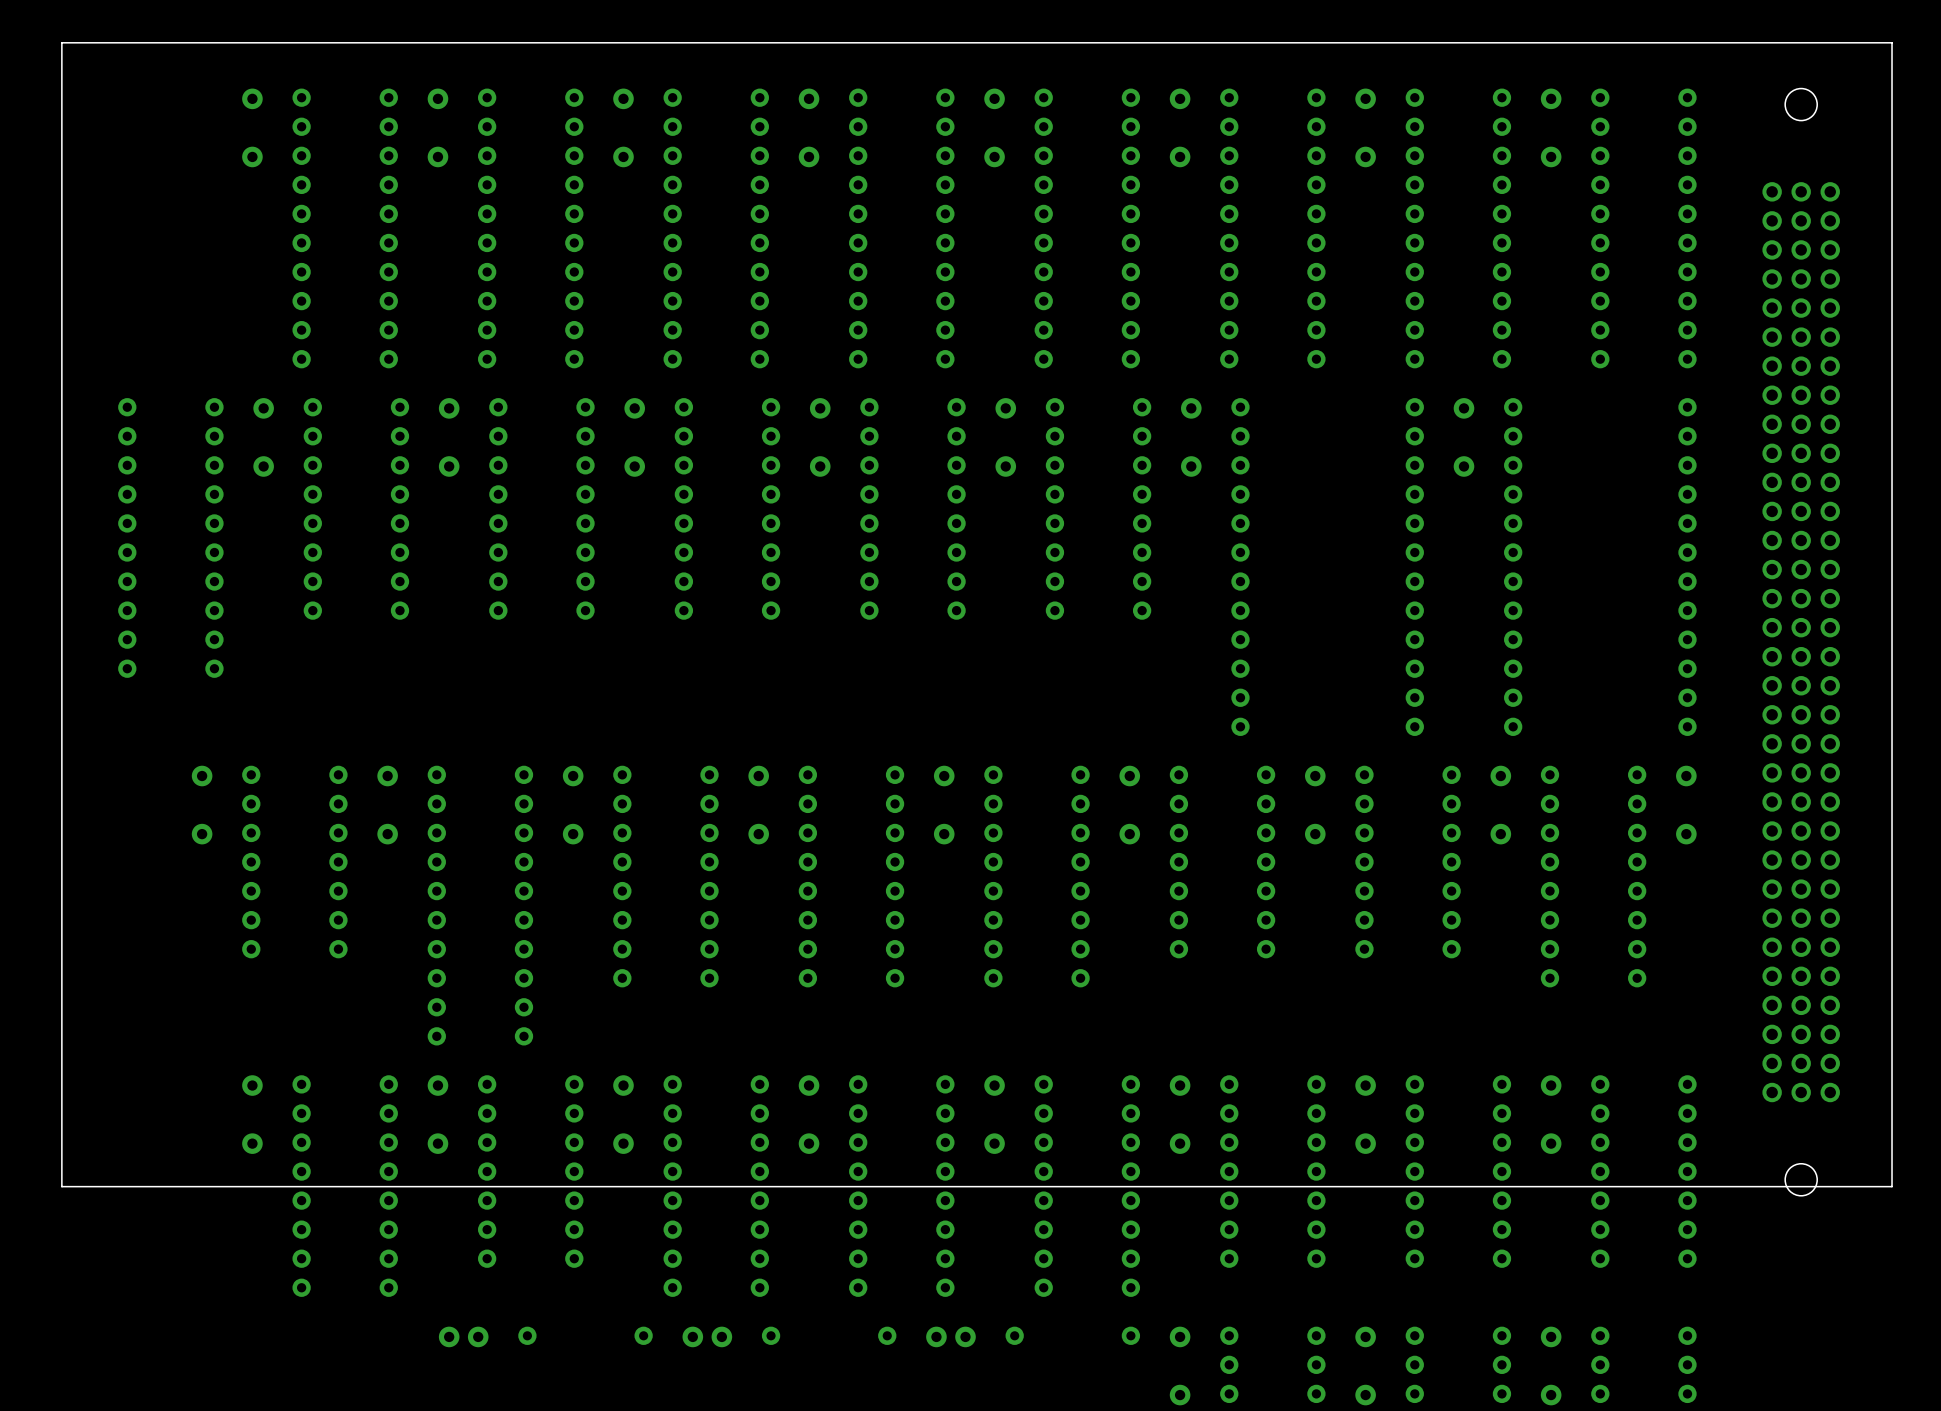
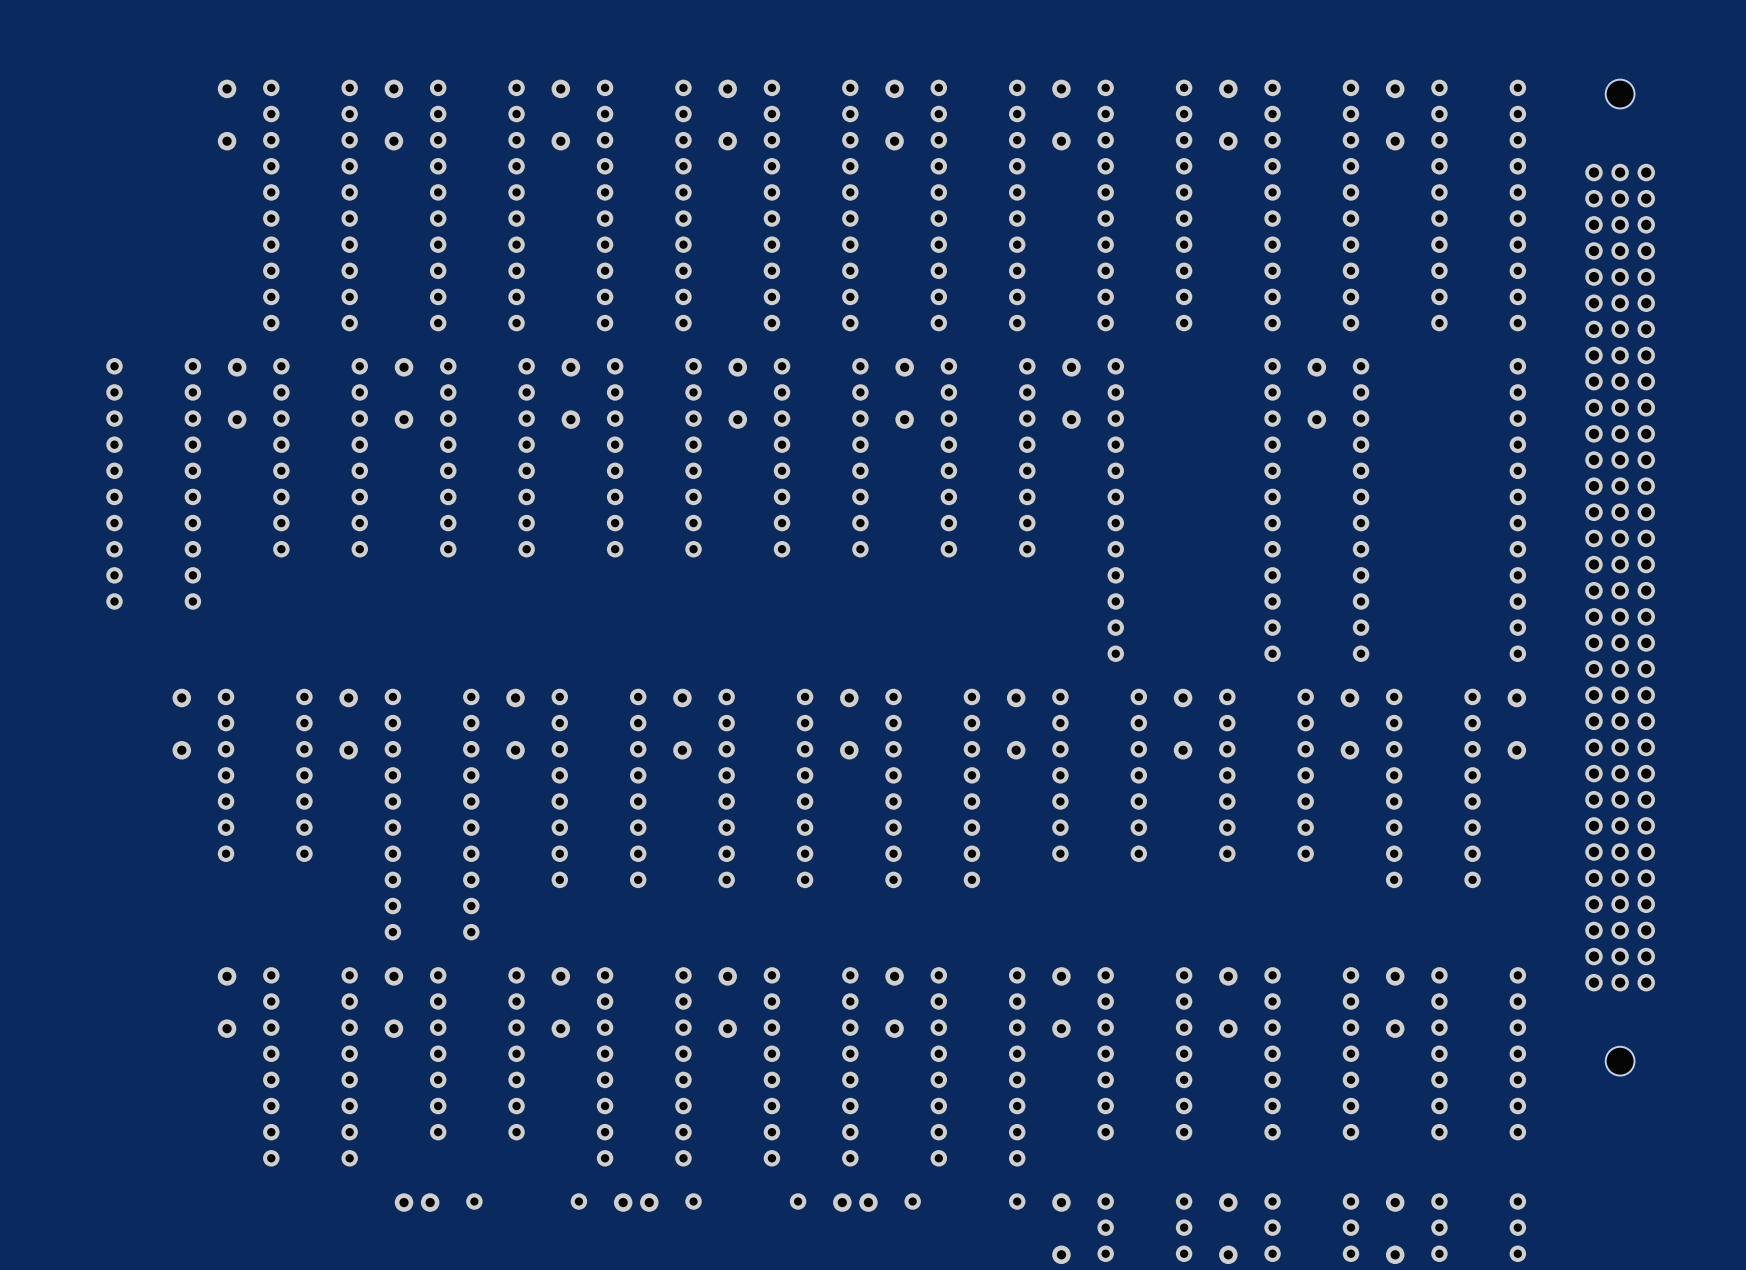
board edge: (1892, 42) (61, 42) (61, 1186) (1892, 1186) (1892, 42) -> none

